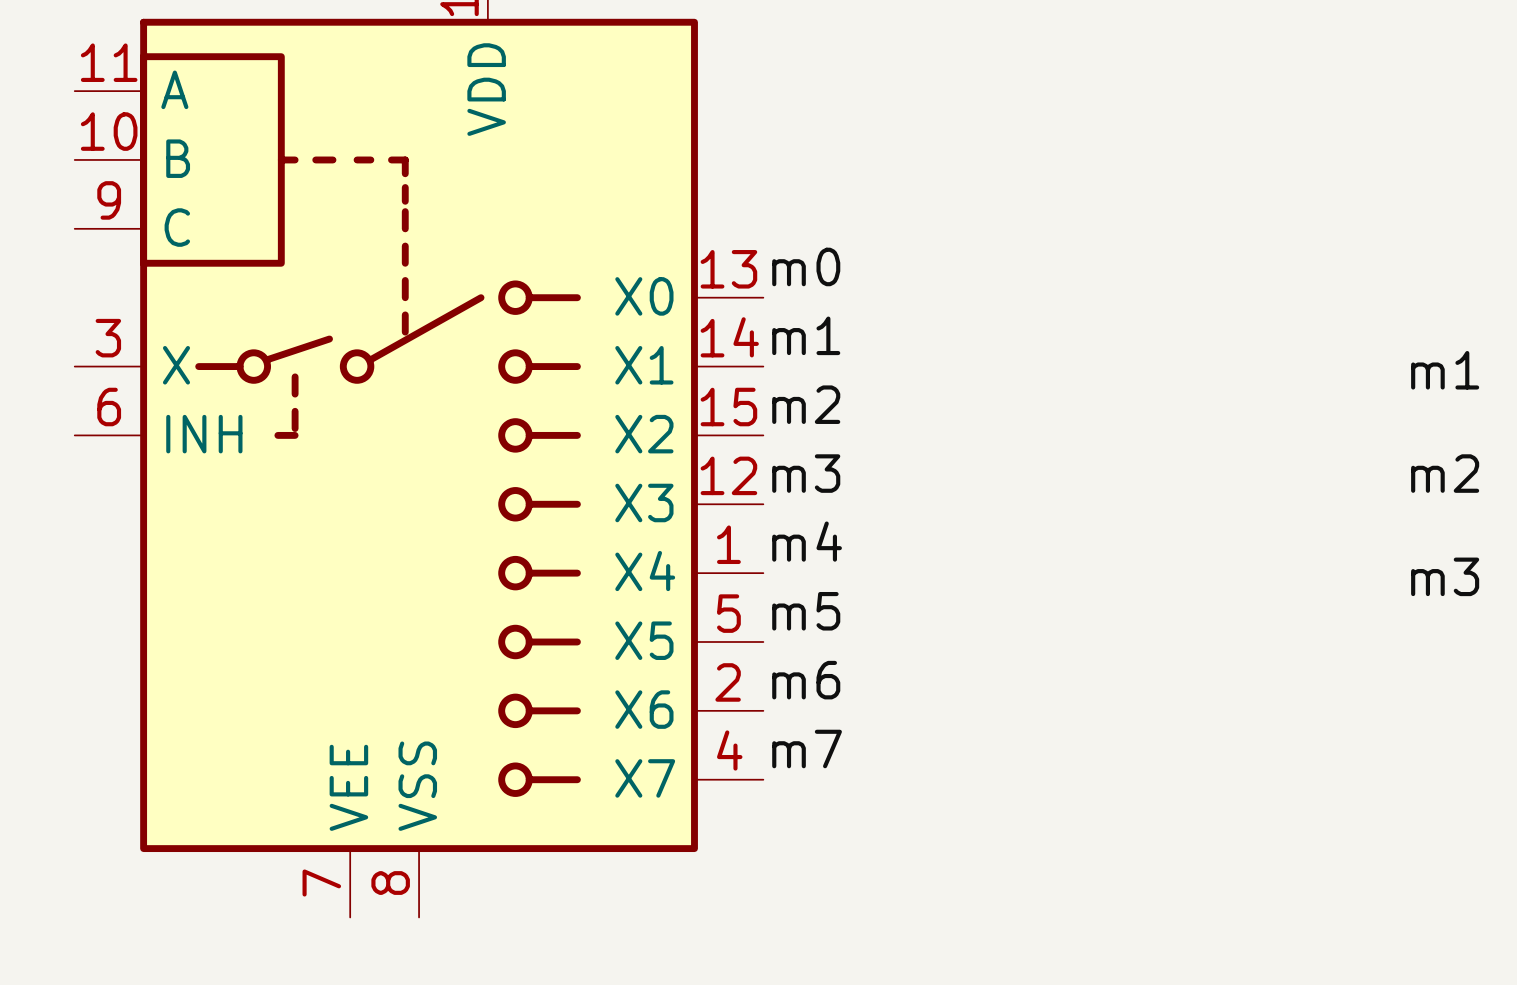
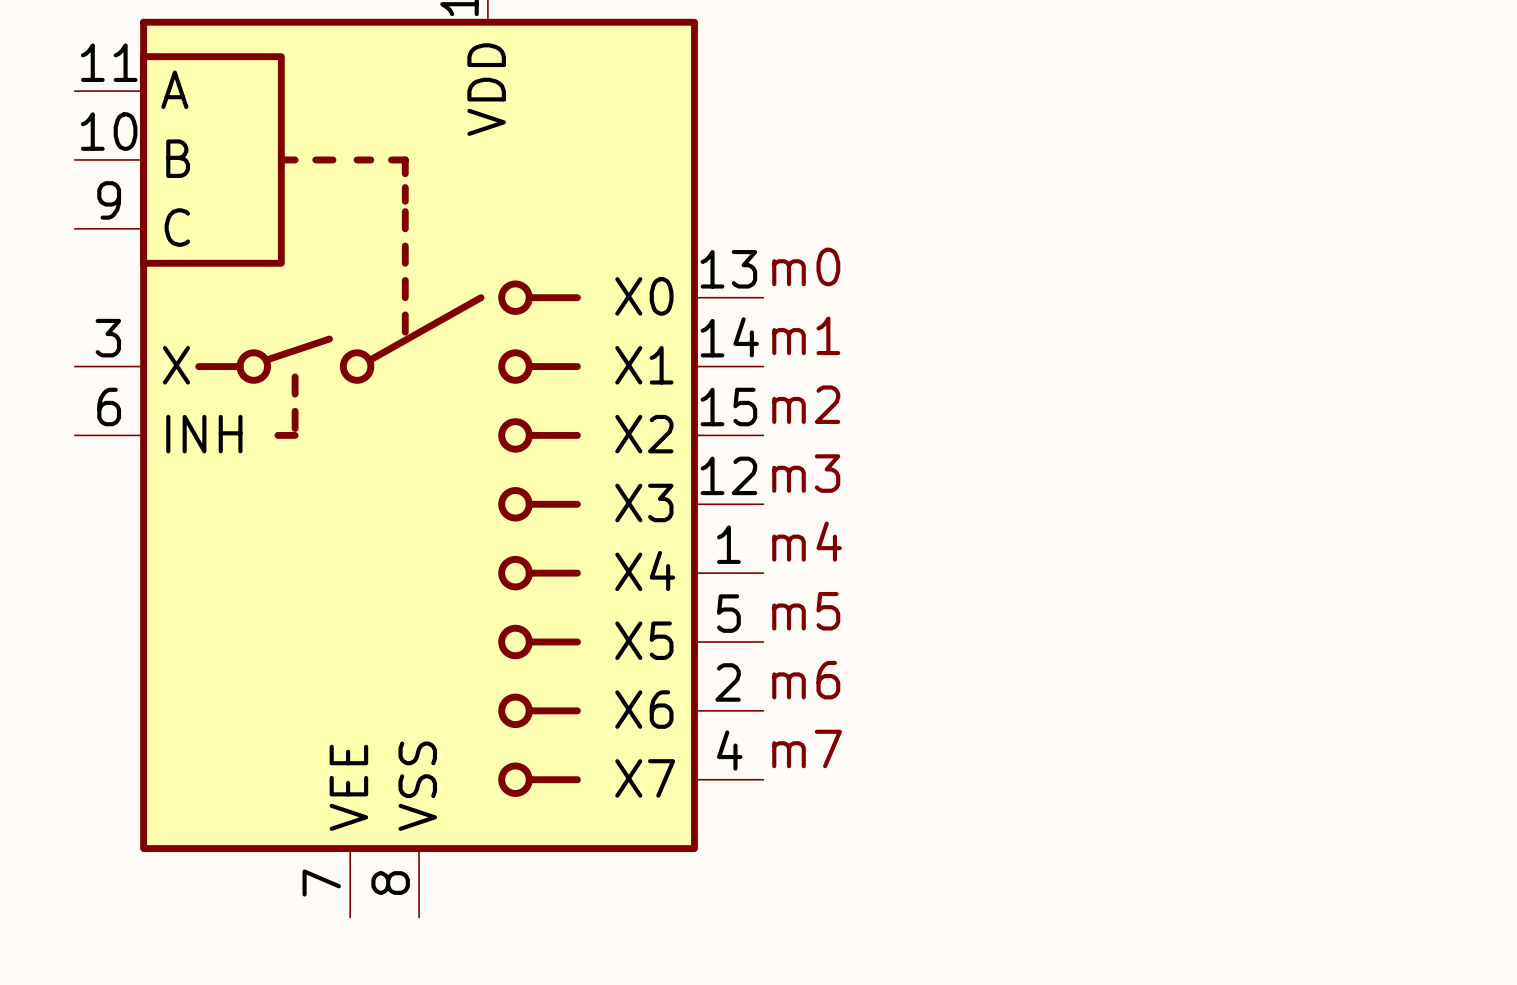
label: m1 (1445, 370) -> none
label: m2 (1445, 473) -> none
label: m3 (1445, 576) -> none

